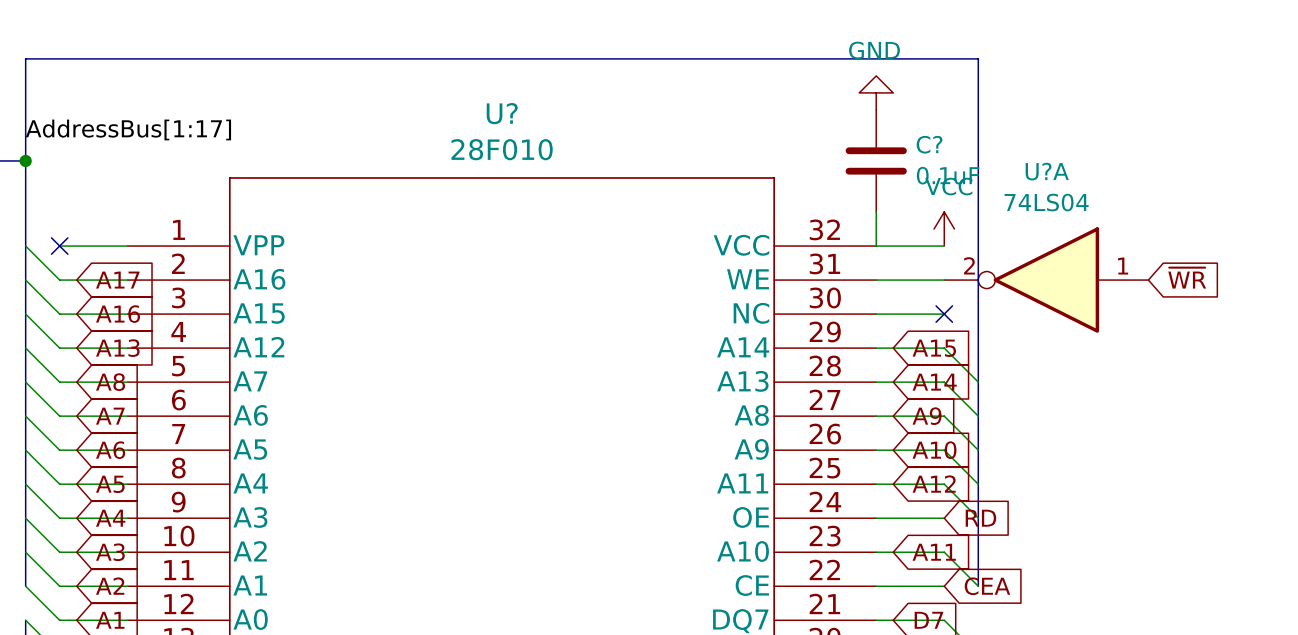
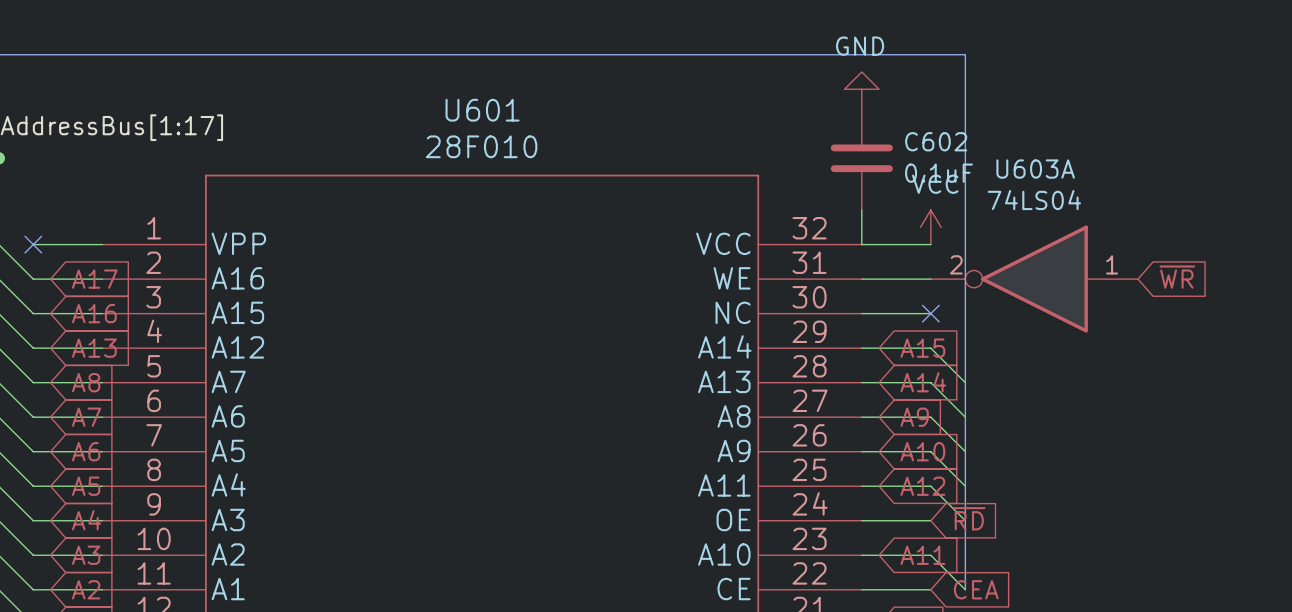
U? name: U? (502, 113) -> U601 (482, 110)
C? name: C? (929, 144) -> C602 (936, 141)
U?A name: U?A (1047, 171) -> U603A (1035, 169)
global label: RD (980, 518) -> ~{RD} (968, 518)

